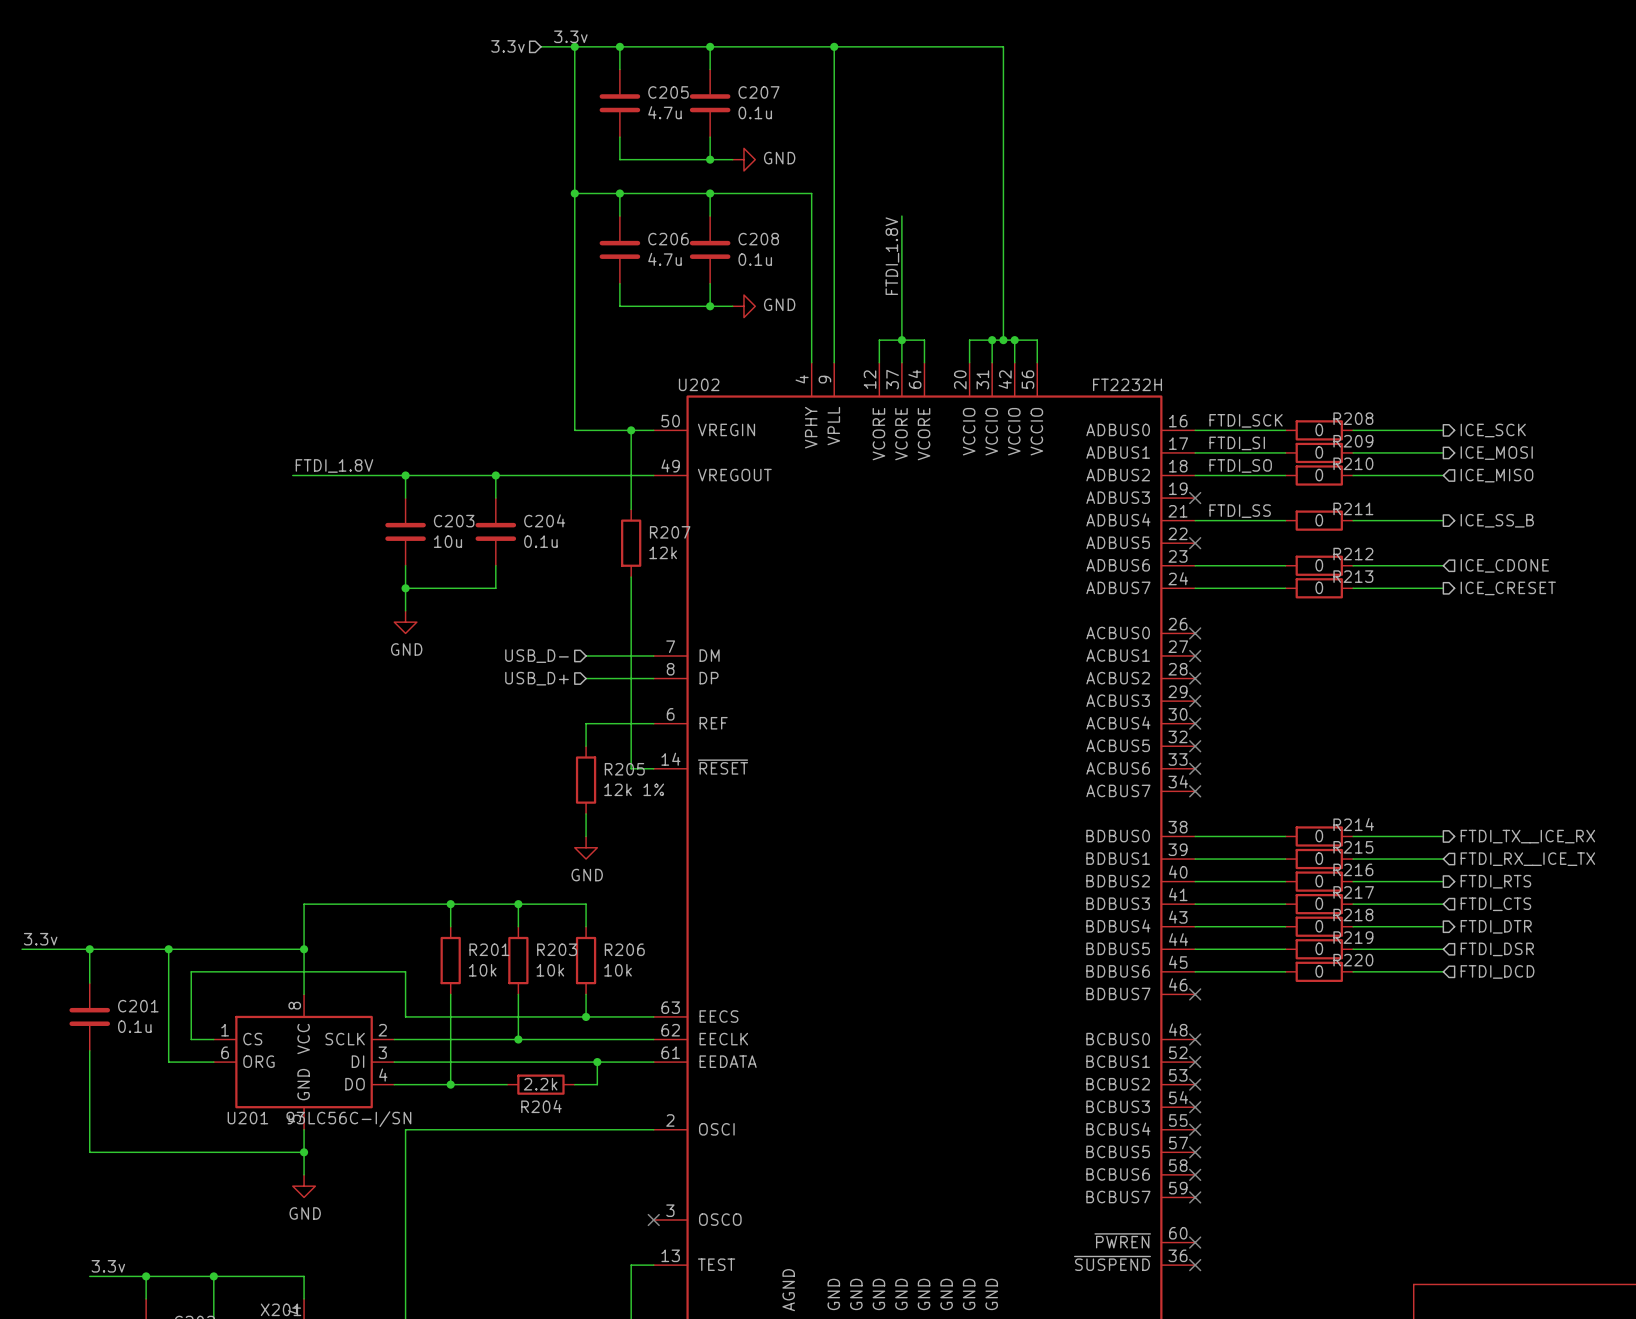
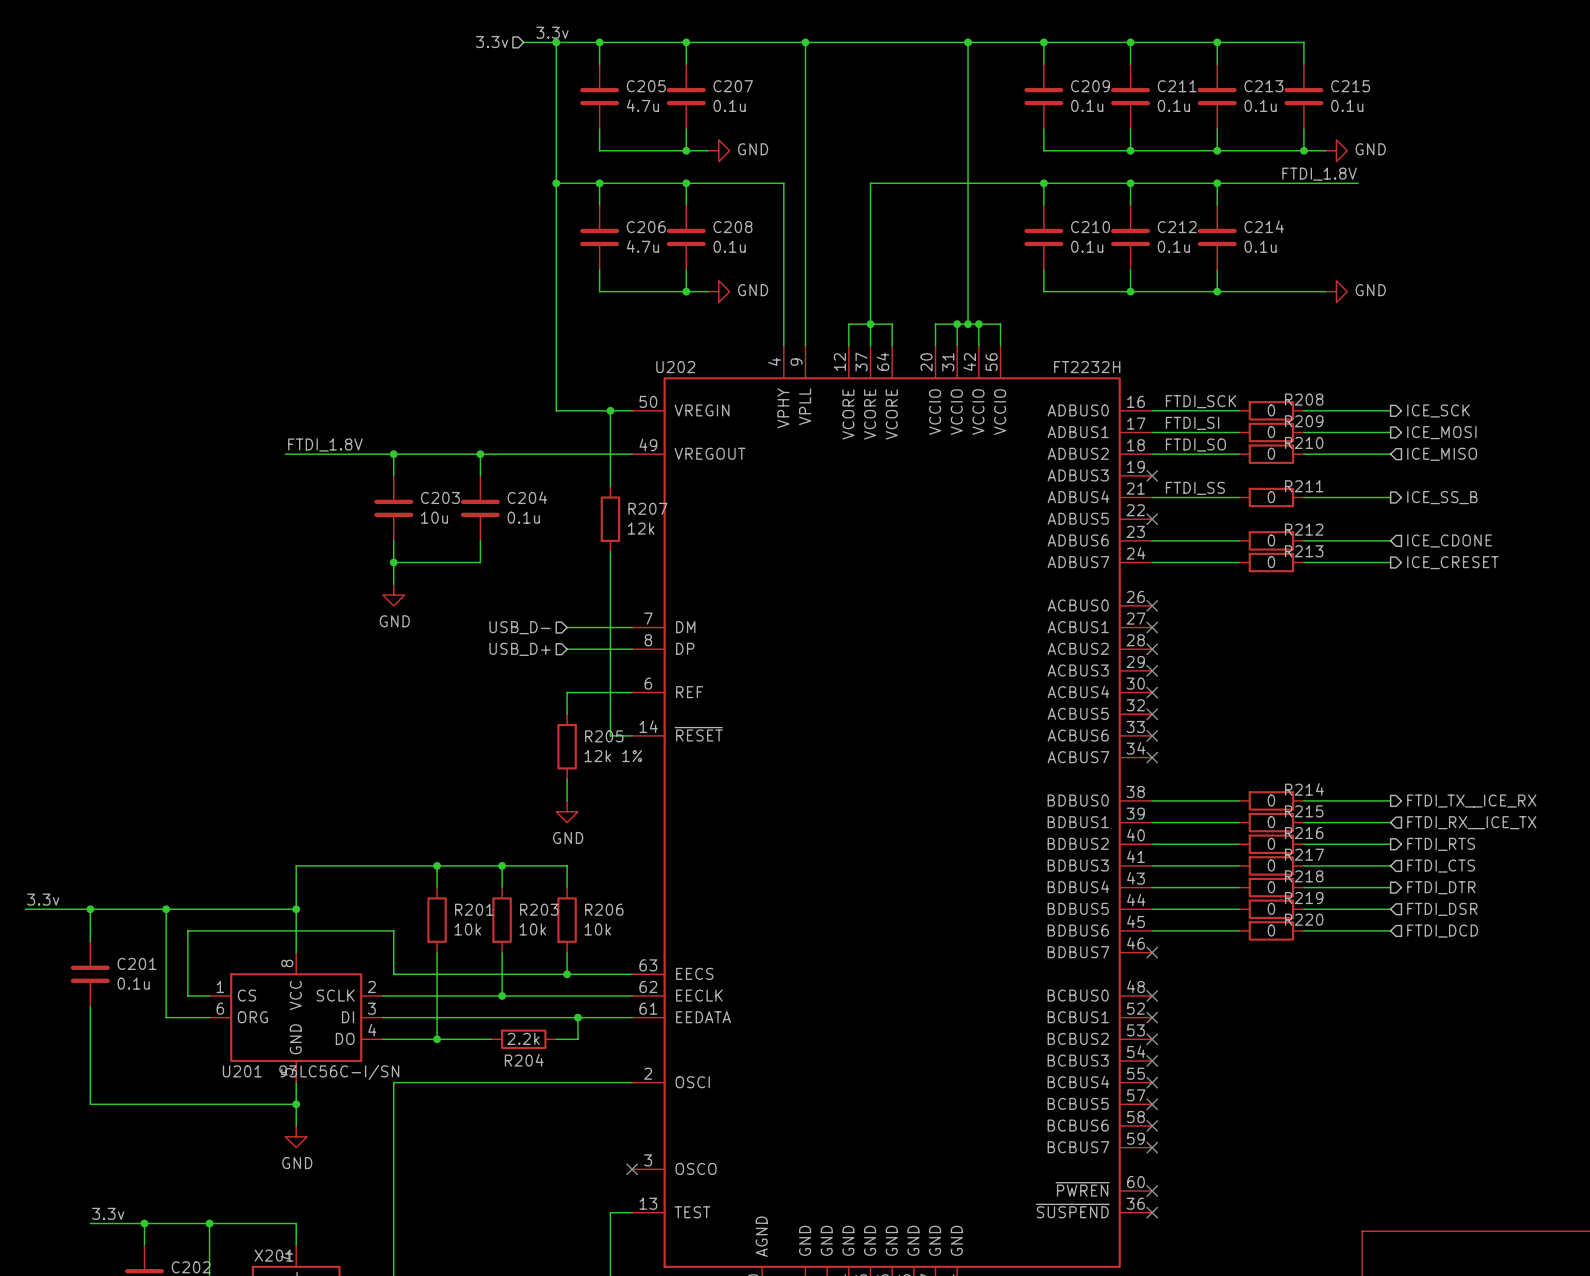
wire: none -> (968, 42) (1303, 42) (1303, 64)
junction: none -> (968, 42)
wire: none -> (1043, 42) (1043, 64)
junction: none -> (1043, 42)
wire: none -> (1130, 42) (1130, 64)
junction: none -> (1130, 42)
wire: none -> (1217, 42) (1217, 64)
junction: none -> (1217, 42)
C209: none -> 0.1u (1043, 96)
C211: none -> 0.1u (1130, 96)
C213: none -> 0.1u (1217, 96)
C215: none -> 0.1u (1303, 96)
wire: none -> (1043, 129) (1043, 150) (1325, 150)
wire: none -> (1130, 129) (1130, 150)
wire: none -> (1217, 129) (1217, 150)
wire: none -> (1303, 129) (1303, 150)
junction: none -> (1130, 150)
junction: none -> (1217, 150)
junction: none -> (1303, 150)
power symbol: none -> GND (1336, 150)
label: none -> FTDI_1.8V (1319, 174)
wire: none -> (1043, 183) (1043, 204)
junction: none -> (1043, 183)
wire: none -> (1130, 183) (1130, 204)
junction: none -> (1130, 183)
wire: none -> (1217, 183) (1217, 204)
junction: none -> (1217, 183)
wire: none -> (1358, 183) (870, 183) (870, 204)
C210: none -> 0.1u (1043, 237)
C212: none -> 0.1u (1130, 237)
C214: none -> 0.1u (1217, 237)
label: FTDI_1.8V (892, 256) -> none
wire: none -> (1043, 269) (1043, 291) (1325, 291)
wire: none -> (1130, 269) (1130, 291)
wire: none -> (1217, 269) (1217, 291)
junction: none -> (1130, 291)
junction: none -> (1217, 291)
power symbol: none -> GND (1336, 291)

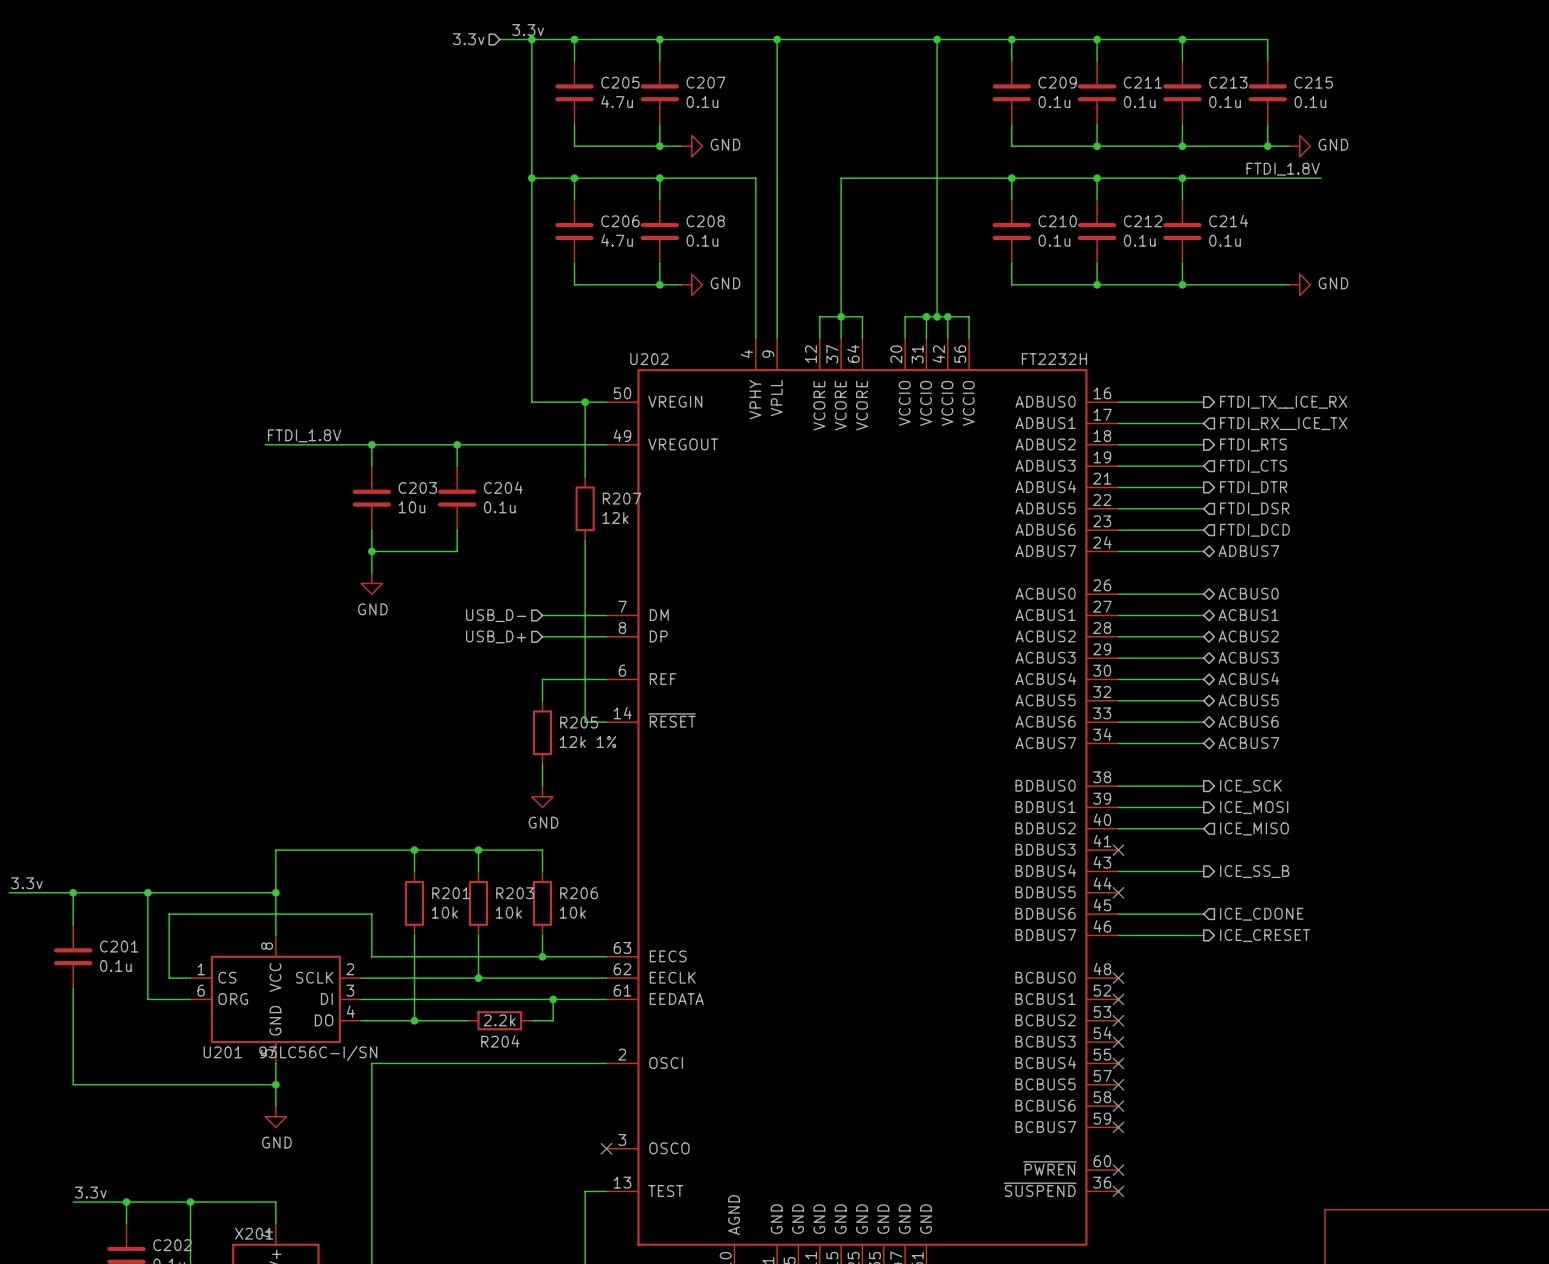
label: FTDI_SCK (1201, 401) -> none
R208: 0 (1271, 410) -> none
wire: (1303, 410) (1390, 410) -> (1118, 466) (1203, 466)
hierarchical label: none -> FTDI_TX__ICE_RX (1283, 402)
hierarchical label: ICE_SCK (1438, 410) -> none
label: FTDI_SI (1192, 423) -> none
R209: 0 (1271, 432) -> none
wire: (1303, 432) (1390, 432) -> none
hierarchical label: none -> FTDI_RX__ICE_TX (1283, 423)
hierarchical label: ICE_MOSI (1441, 432) -> none
label: FTDI_SO (1195, 445) -> none
R210: 0 (1271, 454) -> none
hierarchical label: none -> FTDI_RTS (1253, 444)
wire: (1303, 454) (1390, 454) -> (1118, 508) (1203, 508)
hierarchical label: ICE_MISO (1442, 454) -> none
no-connect mark: (1152, 475) -> none
hierarchical label: none -> FTDI_CTS (1253, 466)
label: FTDI_SS (1195, 488) -> none
R211: 0 (1271, 497) -> none
hierarchical label: none -> FTDI_DTR (1253, 487)
wire: (1303, 497) (1390, 497) -> none
hierarchical label: ICE_SS_B (1442, 497) -> none
no-connect mark: (1152, 519) -> none
hierarchical label: none -> FTDI_DSR (1254, 508)
R212: 0 (1271, 540) -> none
hierarchical label: none -> FTDI_DCD (1254, 530)
wire: (1303, 540) (1390, 540) -> (1118, 594) (1203, 594)
hierarchical label: ICE_CDONE (1449, 540) -> none
R213: 0 (1271, 562) -> none
hierarchical label: none -> ADBUS7 (1248, 551)
wire: (1303, 562) (1390, 562) -> (1118, 615) (1203, 615)
hierarchical label: ICE_CRESET (1452, 562) -> none
no-connect mark: (1152, 605) -> none
hierarchical label: none -> ACBUS0 (1248, 593)
no-connect mark: (1152, 627) -> none
hierarchical label: none -> ACBUS1 (1248, 615)
hierarchical label: none -> ACBUS2 (1248, 636)
wire: none -> (1118, 636) (1203, 636)
no-connect mark: (1152, 649) -> none
no-connect mark: (1152, 670) -> none
hierarchical label: none -> ACBUS3 (1248, 657)
hierarchical label: none -> ACBUS4 (1248, 678)
no-connect mark: (1152, 692) -> none
hierarchical label: none -> ACBUS5 (1248, 700)
no-connect mark: (1152, 714) -> none
no-connect mark: (1152, 735) -> none
hierarchical label: none -> ACBUS6 (1248, 721)
no-connect mark: (1152, 757) -> none
hierarchical label: none -> ACBUS7 (1248, 743)
R214: 0 (1271, 800) -> none
wire: (1303, 800) (1390, 800) -> (1118, 658) (1203, 658)
hierarchical label: none -> ICE_SCK (1250, 786)
hierarchical label: FTDI_TX__ICE_RX (1471, 801) -> none
R215: 0 (1271, 822) -> none
hierarchical label: none -> ICE_MOSI (1254, 807)
wire: (1303, 822) (1390, 822) -> (1118, 679) (1203, 679)
hierarchical label: FTDI_RX__ICE_TX (1471, 822) -> none
R216: 0 (1271, 844) -> none
hierarchical label: none -> ICE_MISO (1254, 828)
wire: (1303, 844) (1390, 844) -> (1118, 700) (1203, 700)
hierarchical label: FTDI_RTS (1441, 844) -> none
wire: (1152, 865) (1238, 865) -> none
no-connect mark: none -> (1118, 850)
R217: 0 (1271, 865) -> none
wire: (1303, 865) (1390, 865) -> (1118, 722) (1203, 722)
hierarchical label: FTDI_CTS (1441, 866) -> none
R218: 0 (1271, 887) -> none
hierarchical label: none -> ICE_SS_B (1254, 871)
wire: (1303, 887) (1390, 887) -> (1118, 935) (1203, 935)
hierarchical label: FTDI_DTR (1441, 887) -> none
wire: (1152, 909) (1238, 909) -> (1118, 743) (1203, 743)
no-connect mark: none -> (1118, 892)
R219: 0 (1271, 909) -> none
wire: (1303, 909) (1390, 909) -> none
hierarchical label: FTDI_DSR (1442, 909) -> none
R220: 0 (1271, 930) -> none
wire: (1303, 930) (1390, 930) -> none
hierarchical label: none -> ICE_CDONE (1261, 914)
hierarchical label: FTDI_DCD (1442, 931) -> none
no-connect mark: (1152, 952) -> none
hierarchical label: none -> ICE_CRESET (1265, 935)

